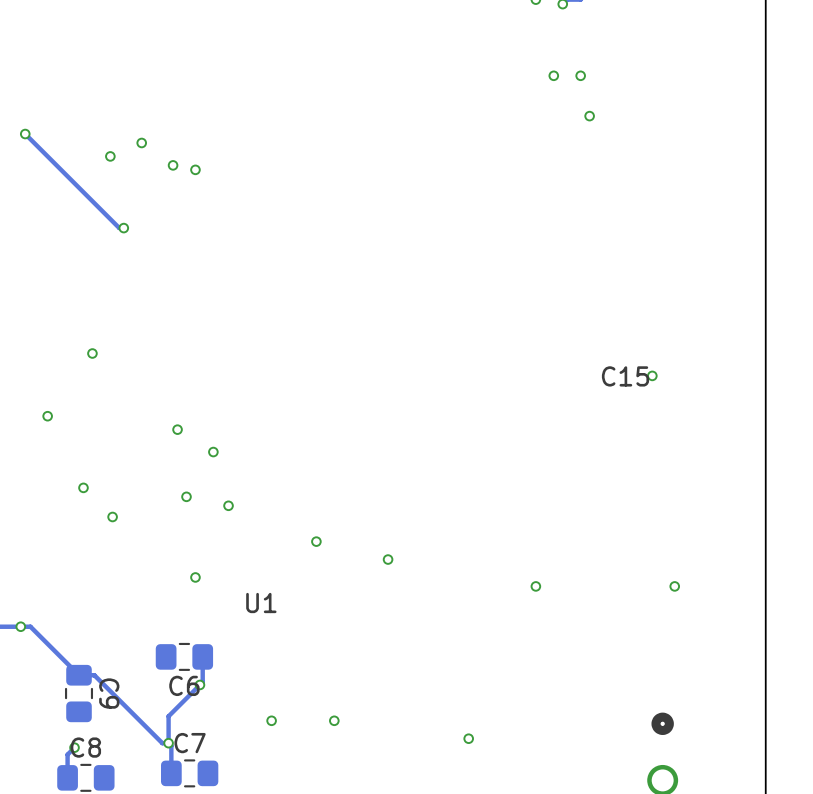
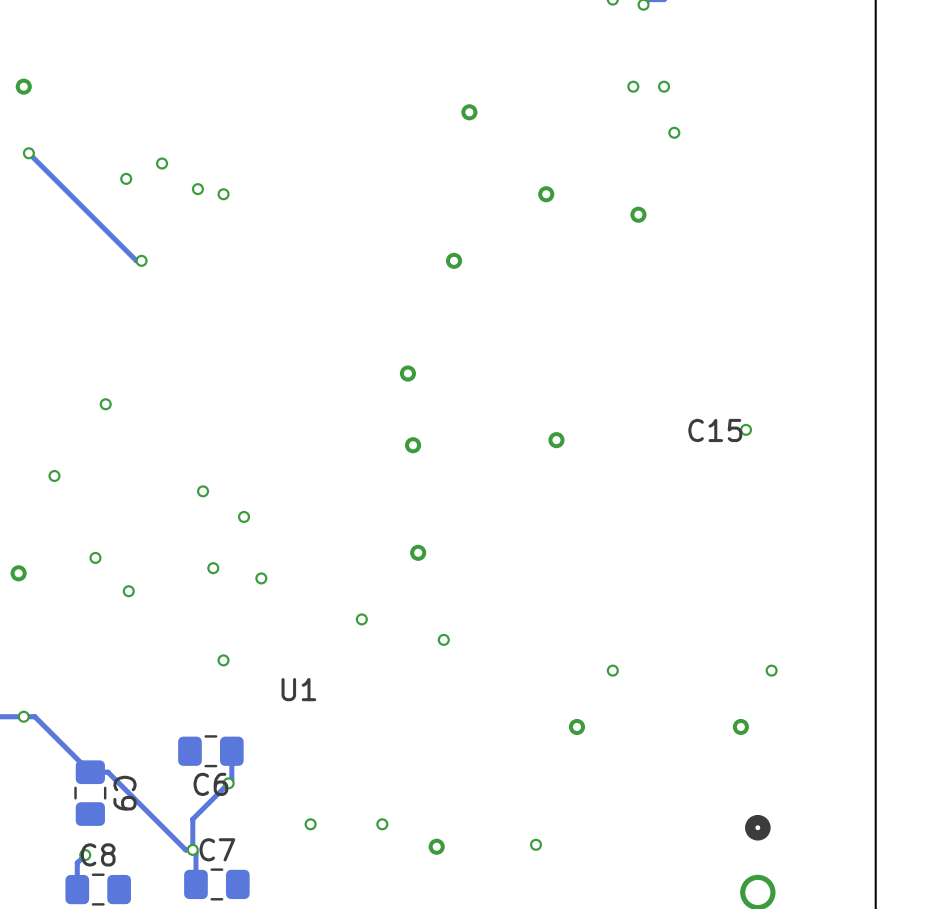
via: none -> (23, 86)
via: none -> (469, 112)
via: none -> (546, 194)
via: none -> (638, 214)
via: none -> (454, 260)
via: none -> (407, 373)
via: none -> (556, 440)
via: none -> (413, 445)
via: none -> (418, 552)
via: none -> (18, 573)
via: none -> (576, 726)
via: none -> (740, 726)
via: none -> (436, 846)

